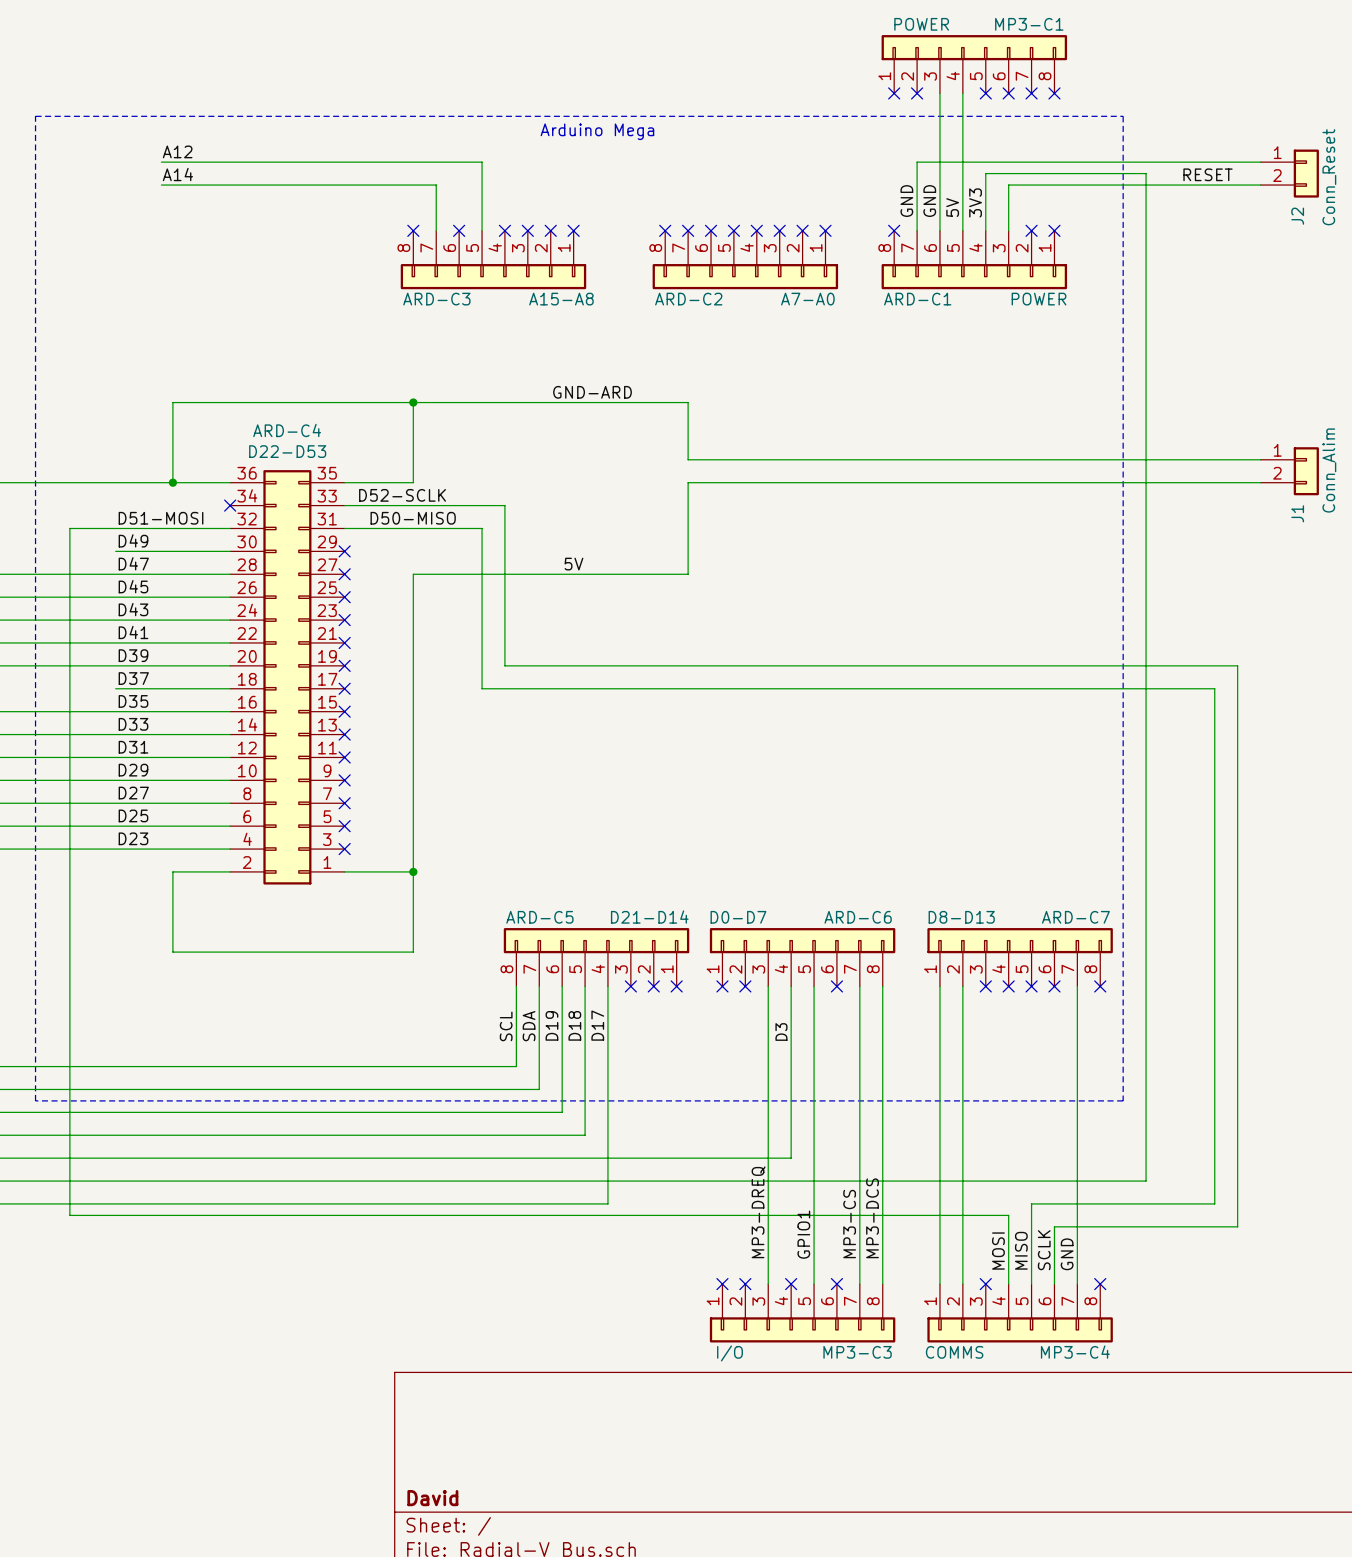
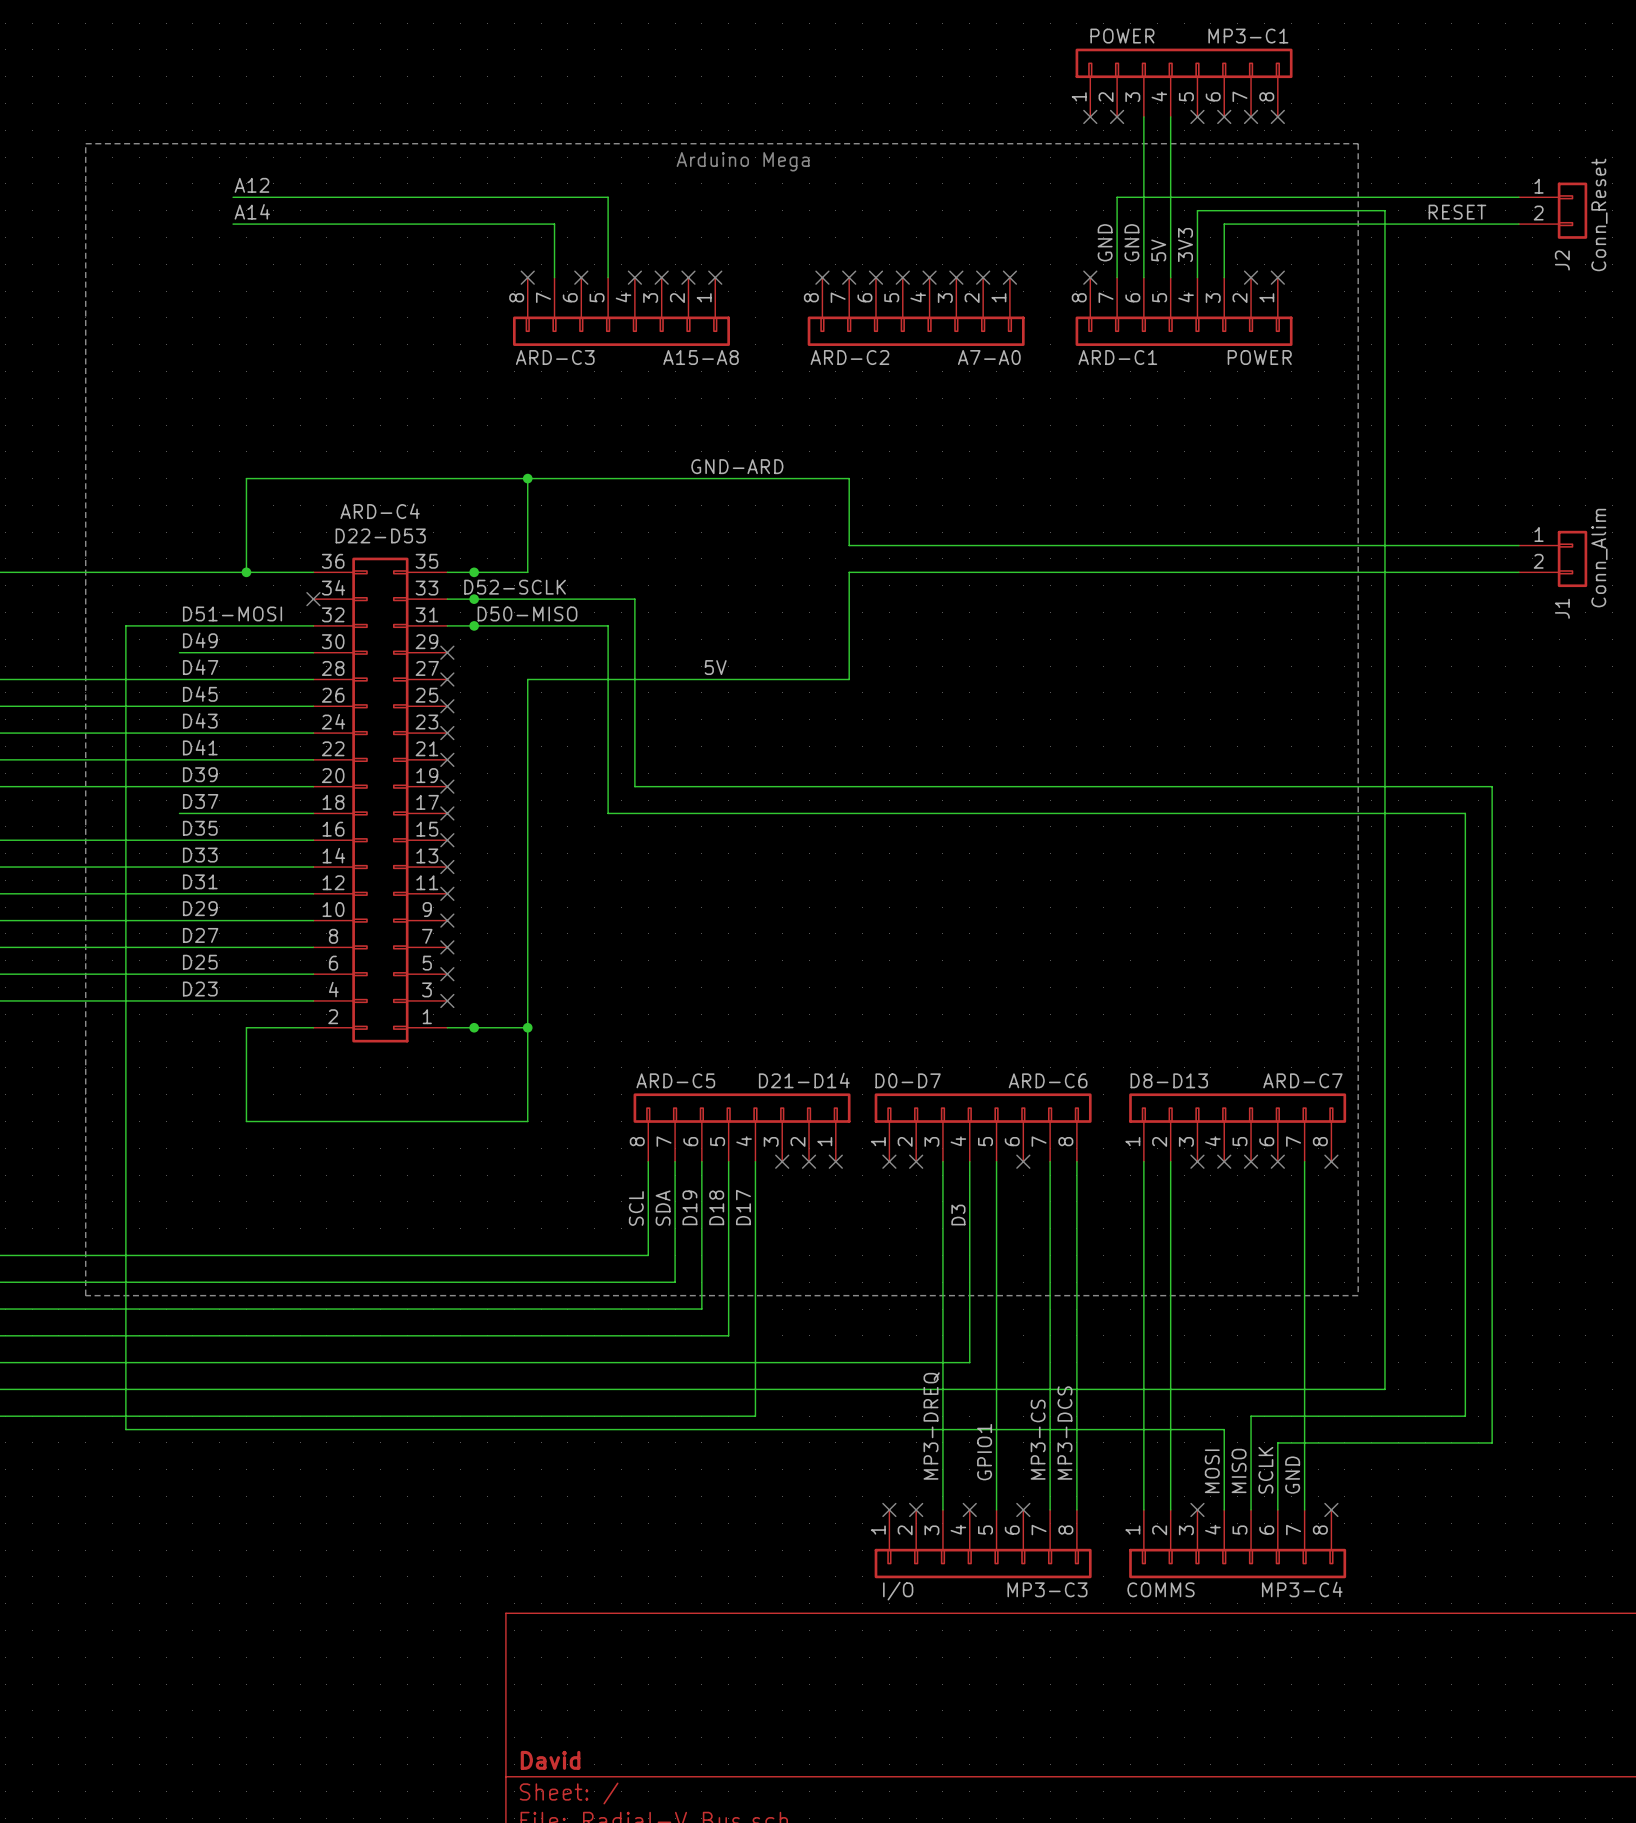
junction: none -> (474, 572)
junction: none -> (474, 599)
junction: none -> (474, 625)
junction: none -> (474, 1027)

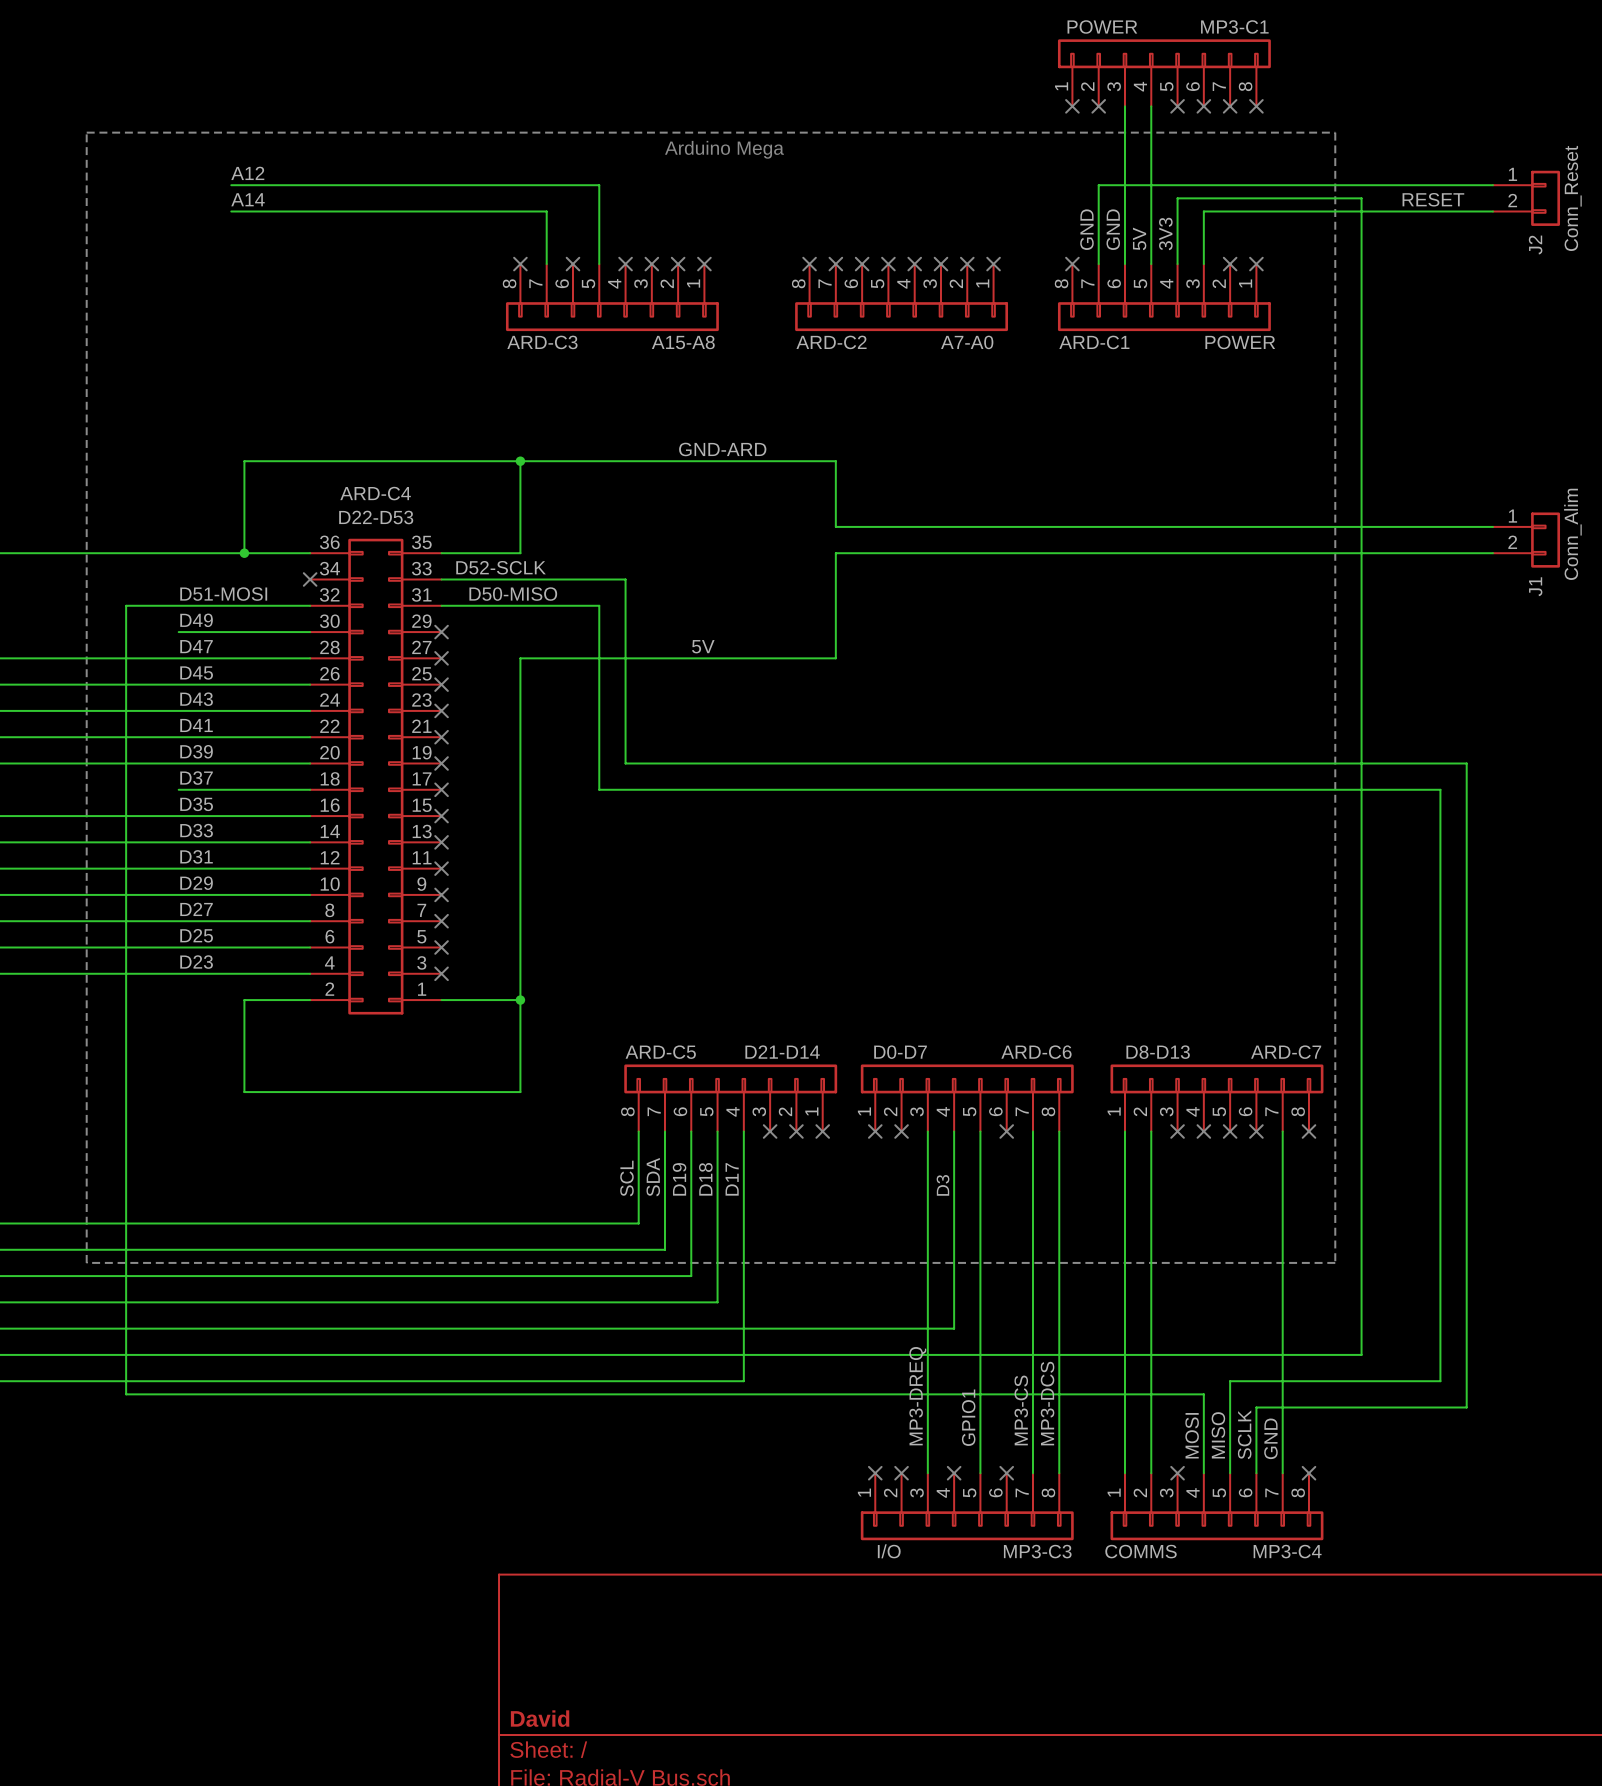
junction: (474, 572) -> none
junction: (474, 599) -> none
junction: (474, 625) -> none
junction: (474, 1027) -> none

